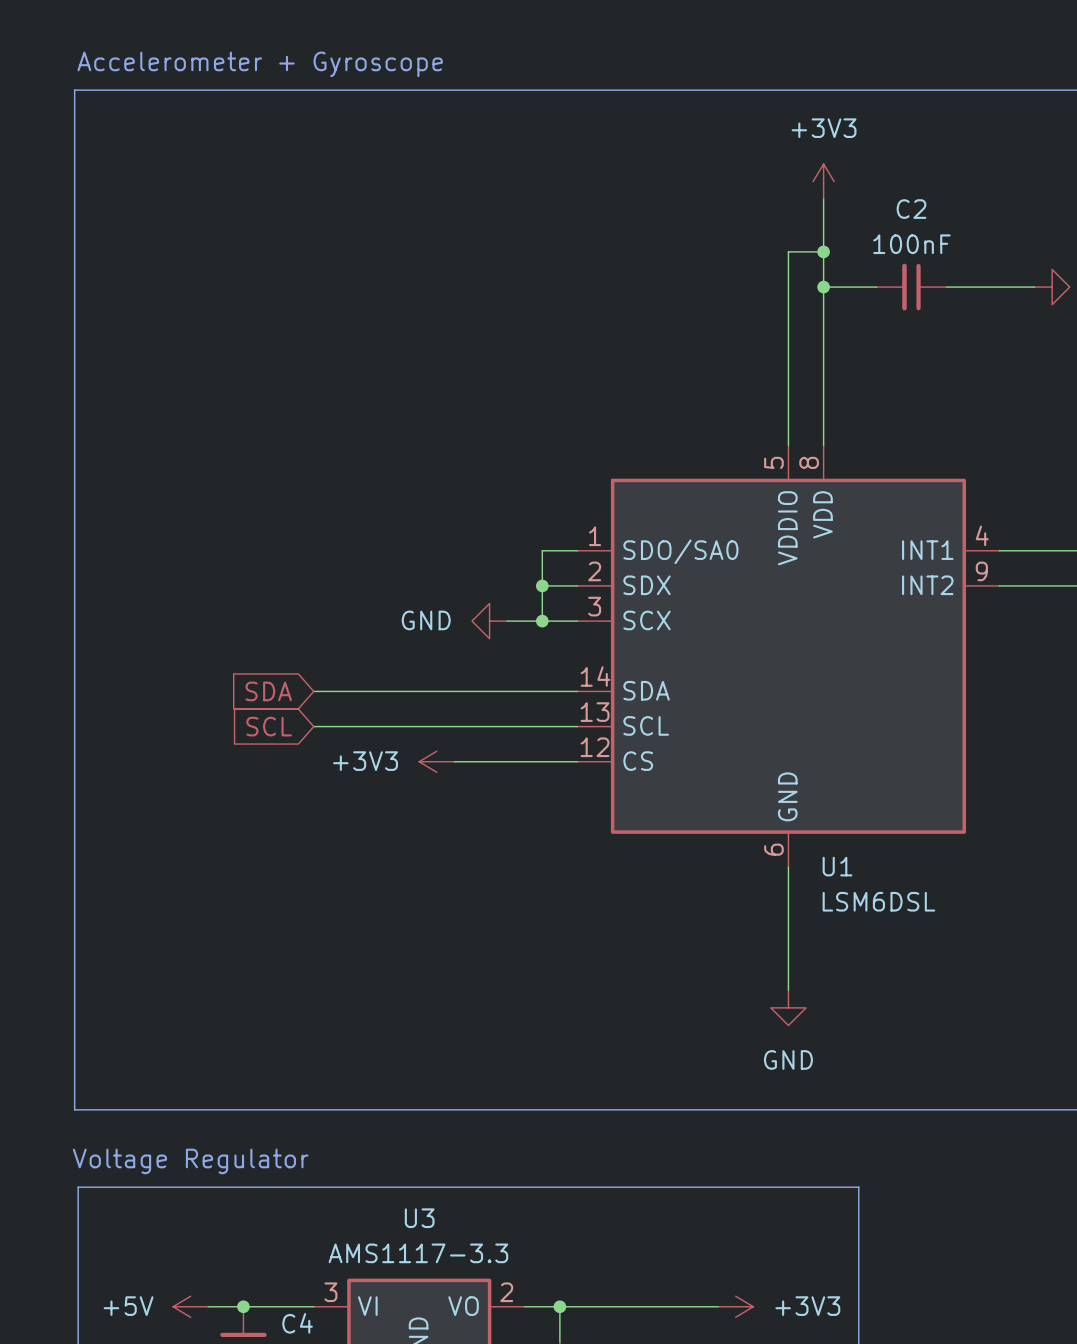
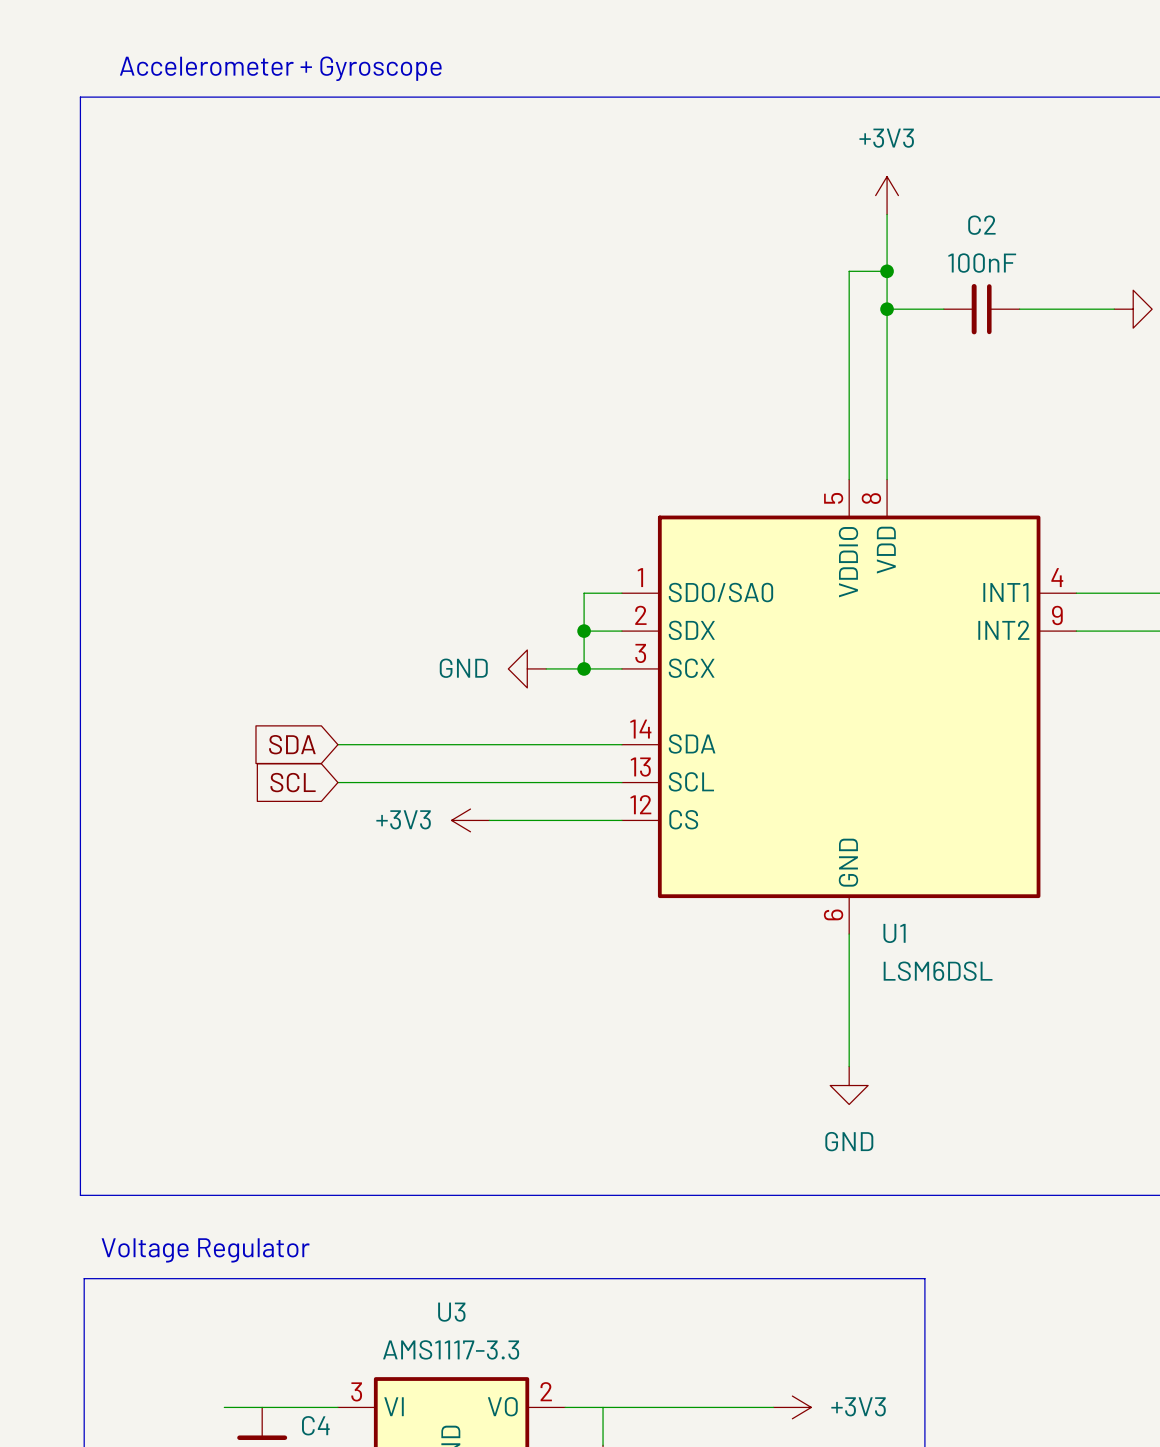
power symbol: +5V (190, 1306) -> none
junction: (243, 1306) -> none
junction: (559, 1306) -> none

